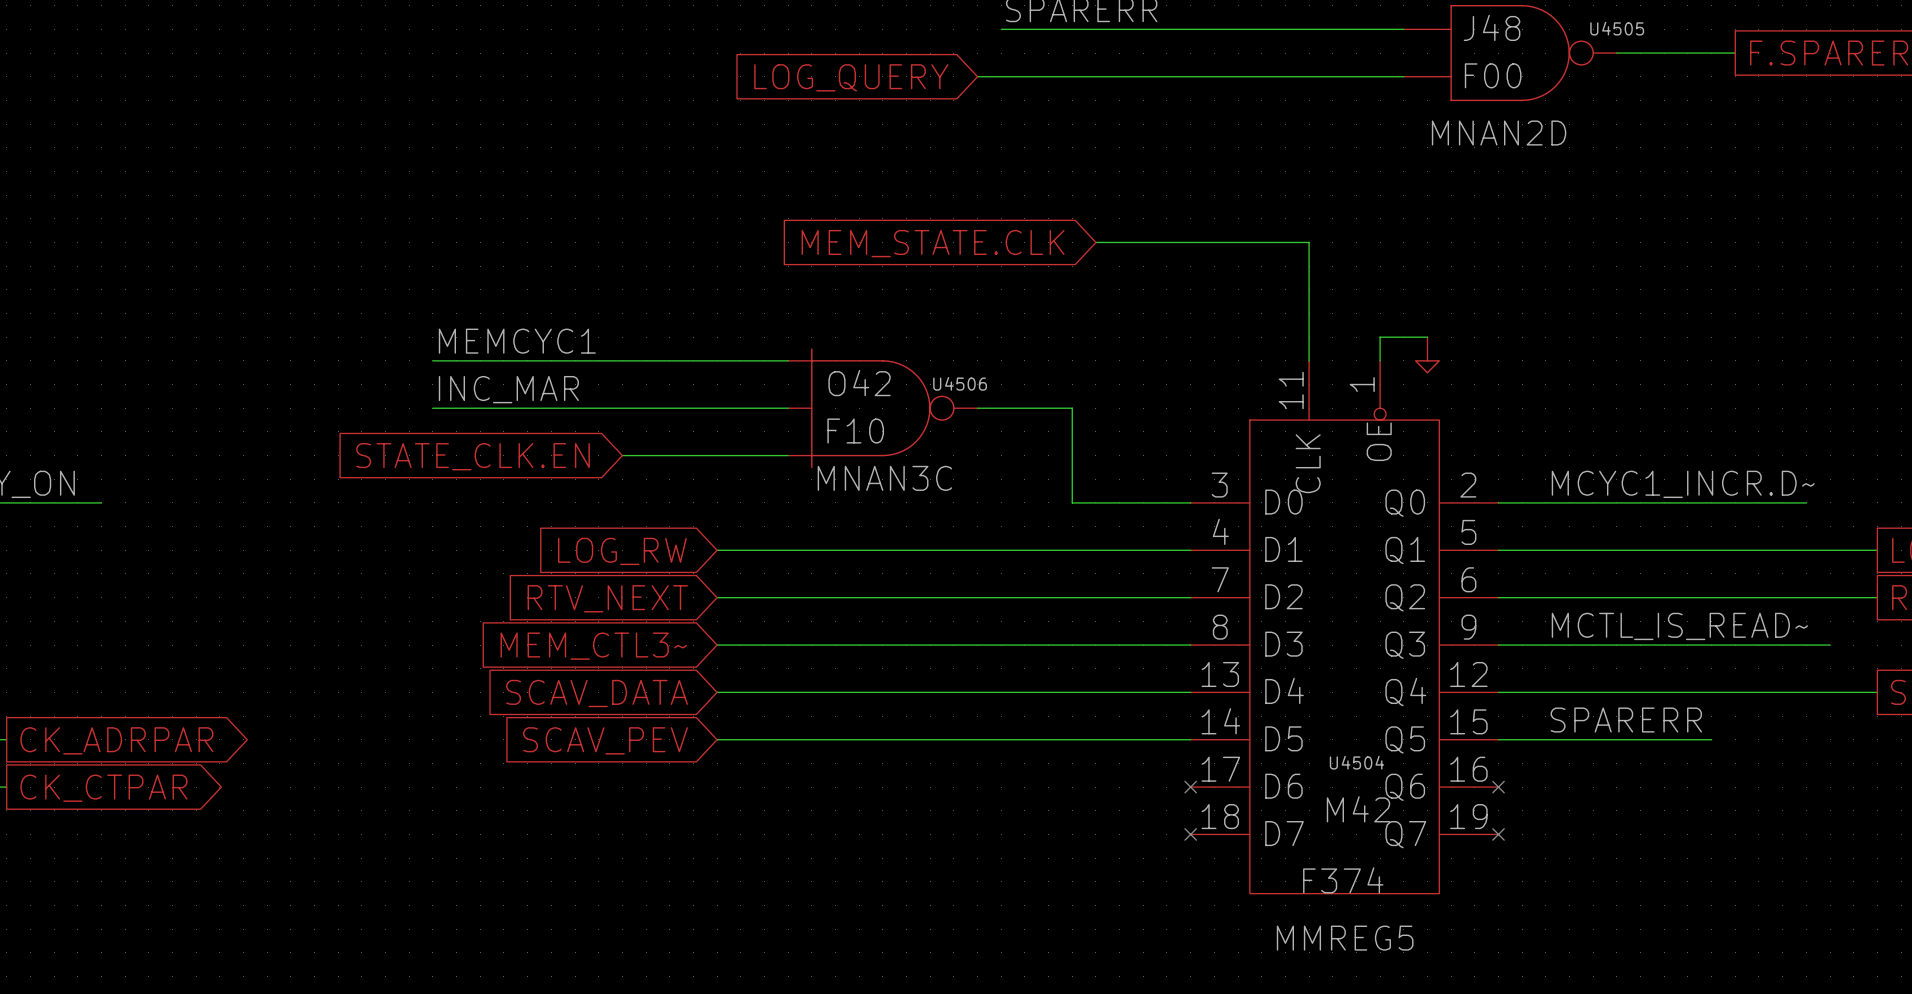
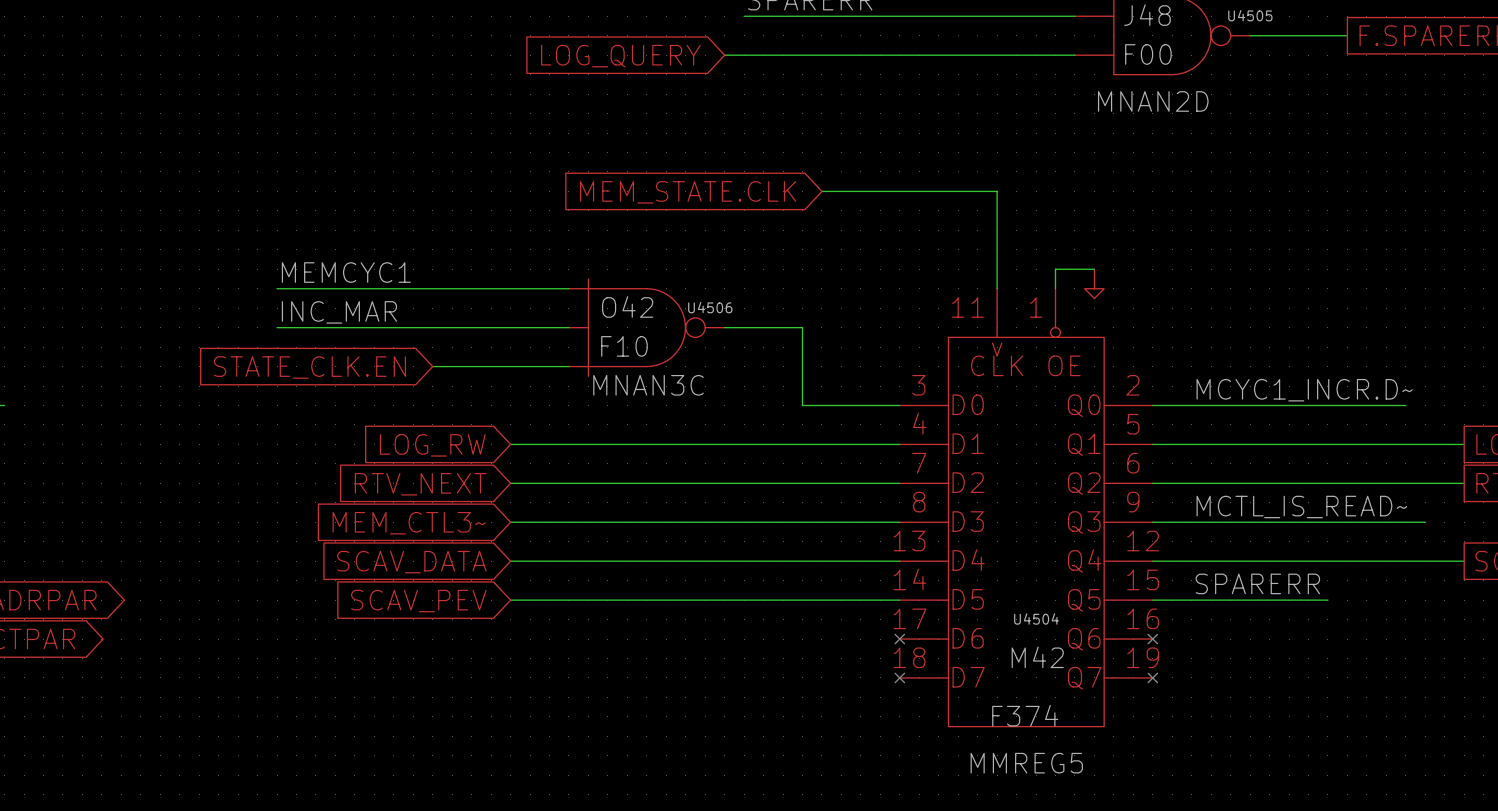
U4504 symbol: [1190, 360, 1499, 894] -> [899, 288, 1153, 727]

